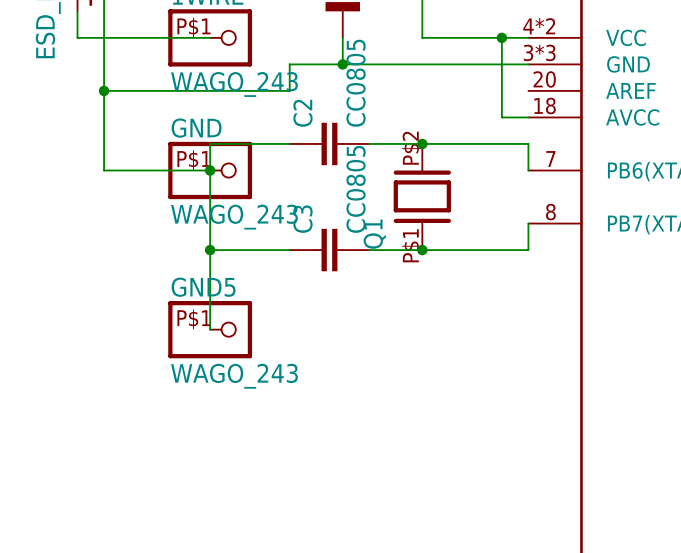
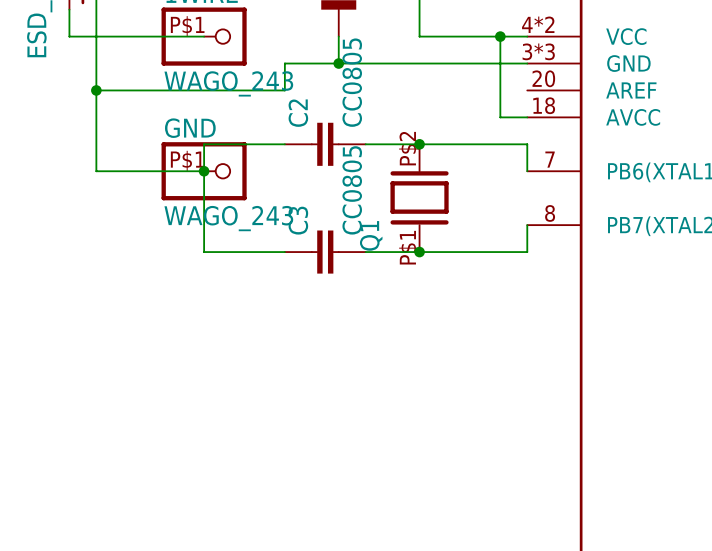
wire: (210, 250) (210, 329) -> none
junction: (210, 250) -> none
GND5: WAGO_243 (210, 329) -> none

